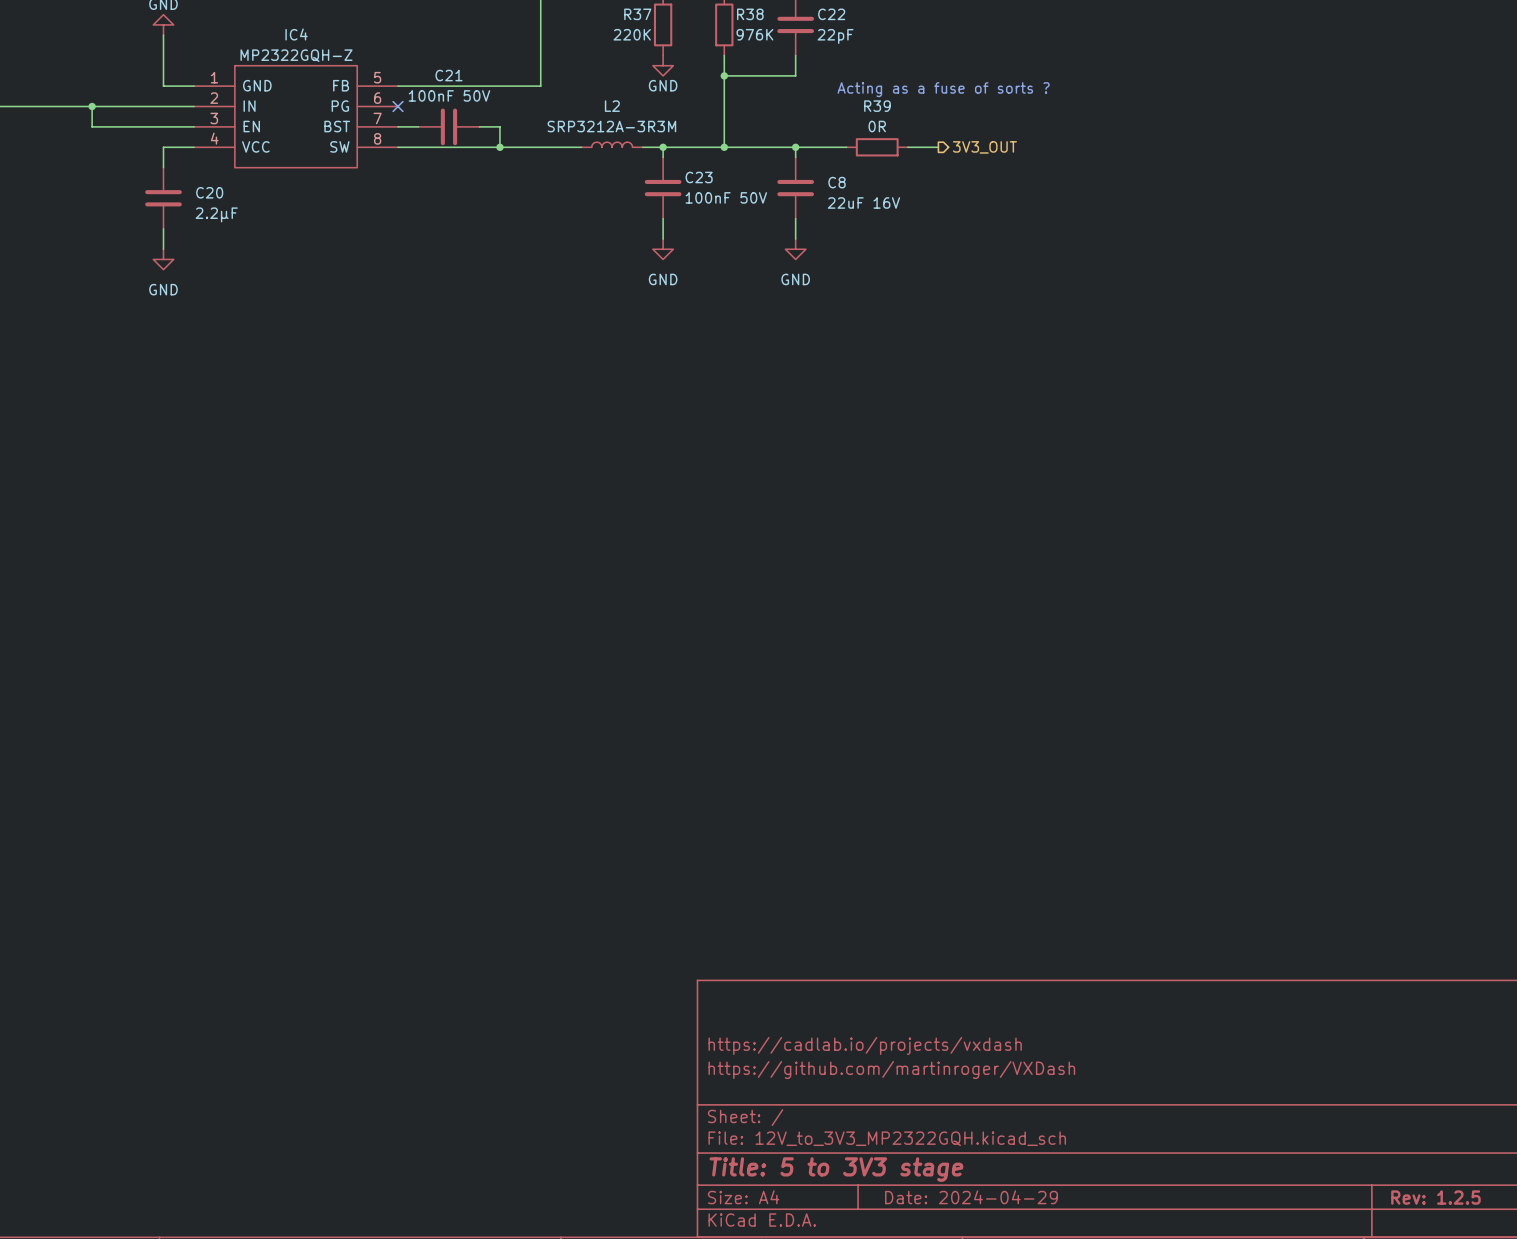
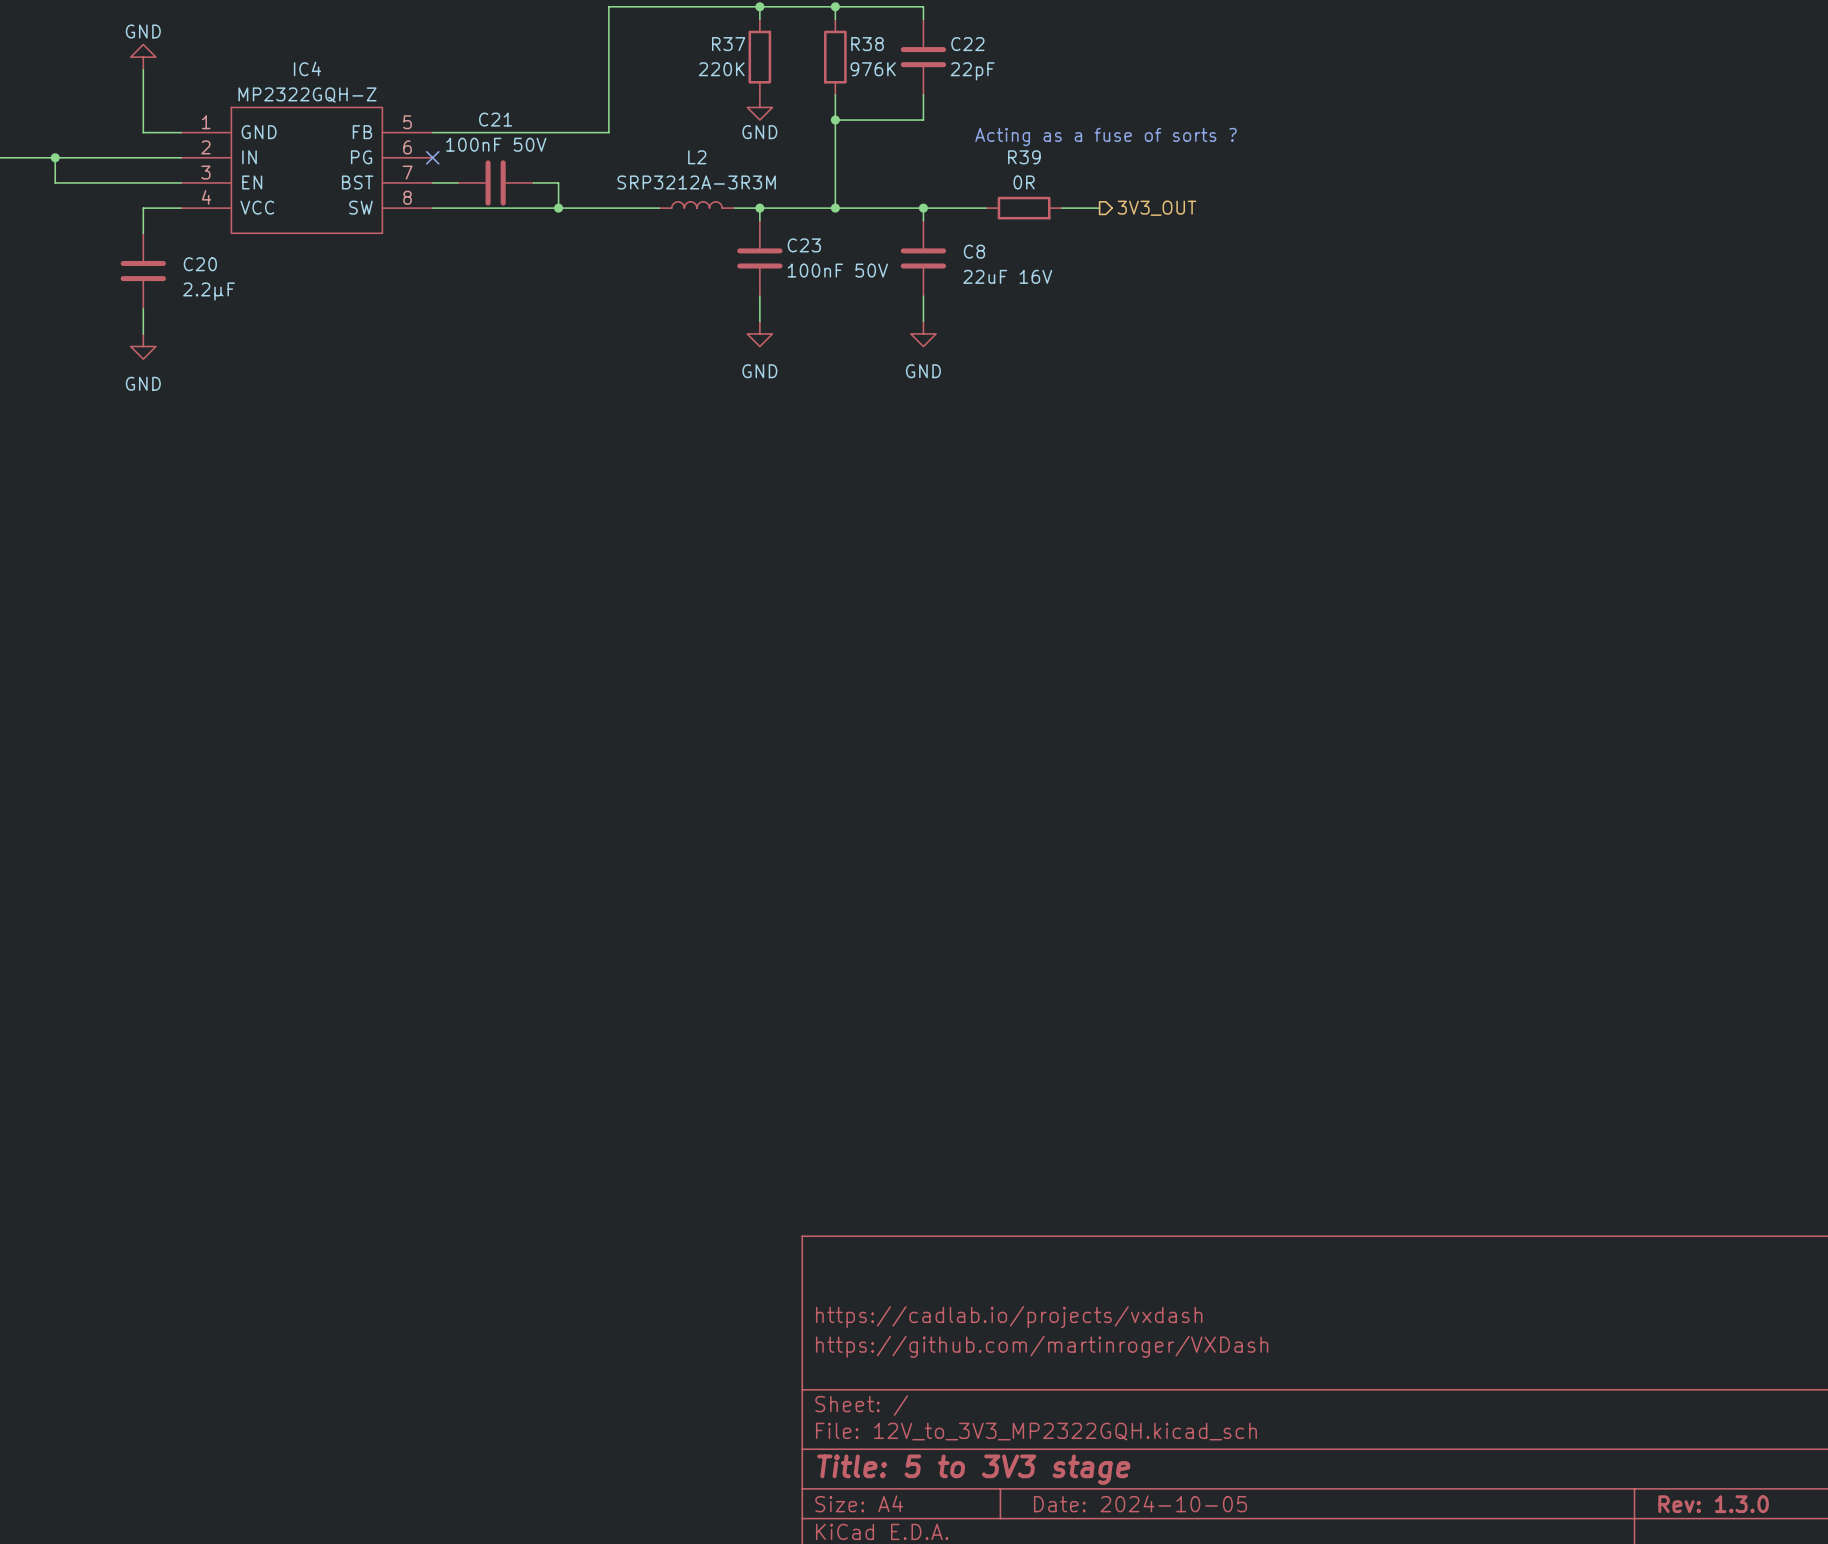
title block: Date: 2024-04-29 (971, 1197) -> Date: 2024-10-05 (1140, 1503)
title block: Rev: 1.2.5 (1435, 1197) -> Rev: 1.3.0 (1713, 1504)

